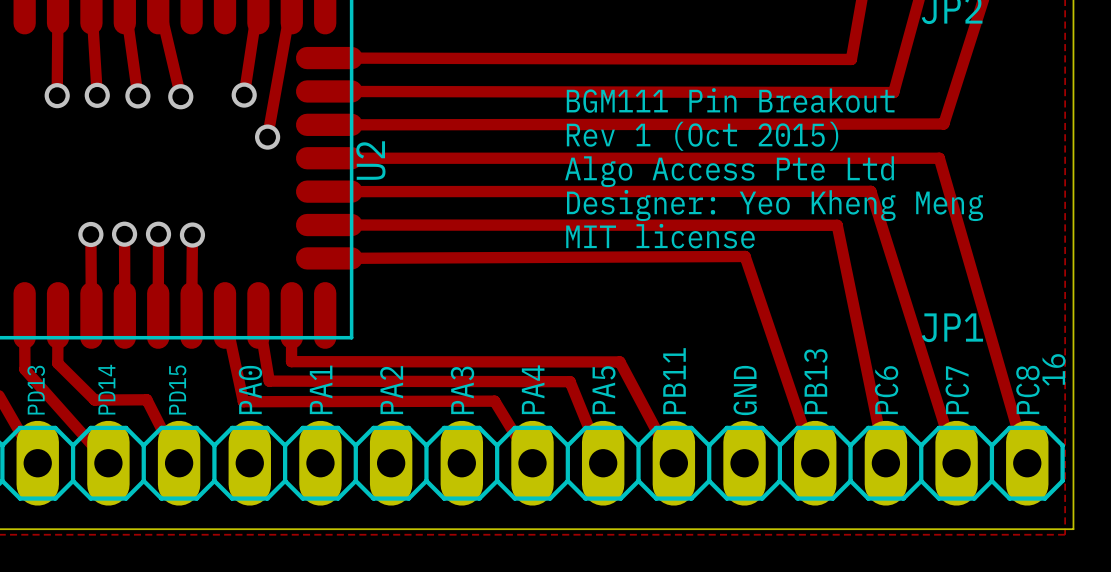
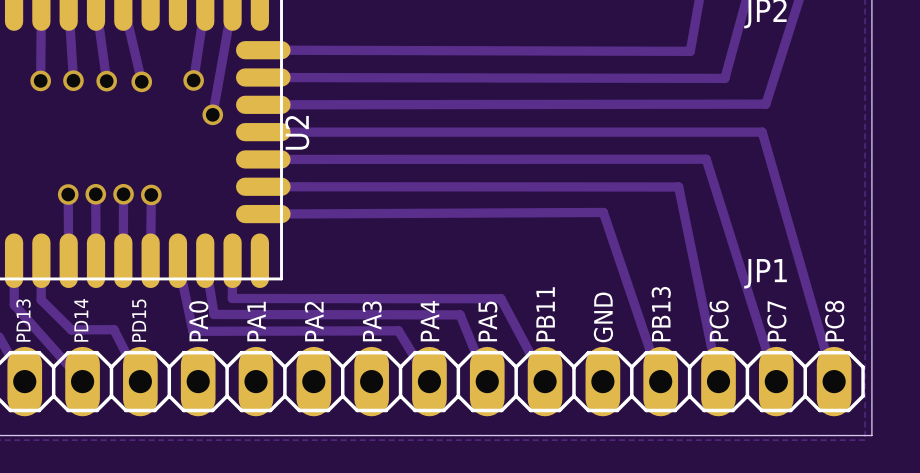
text: BGM111 Pin Breakout (730, 100) -> none
text: Rev 1 (Oct 2015) (702, 136) -> none
text: Algo Access Pte Ltd (729, 171) -> none
text: Designer: Yeo Kheng Meng (775, 205) -> none
text: MIT license (660, 236) -> none
text: 16 (1054, 369) -> none

